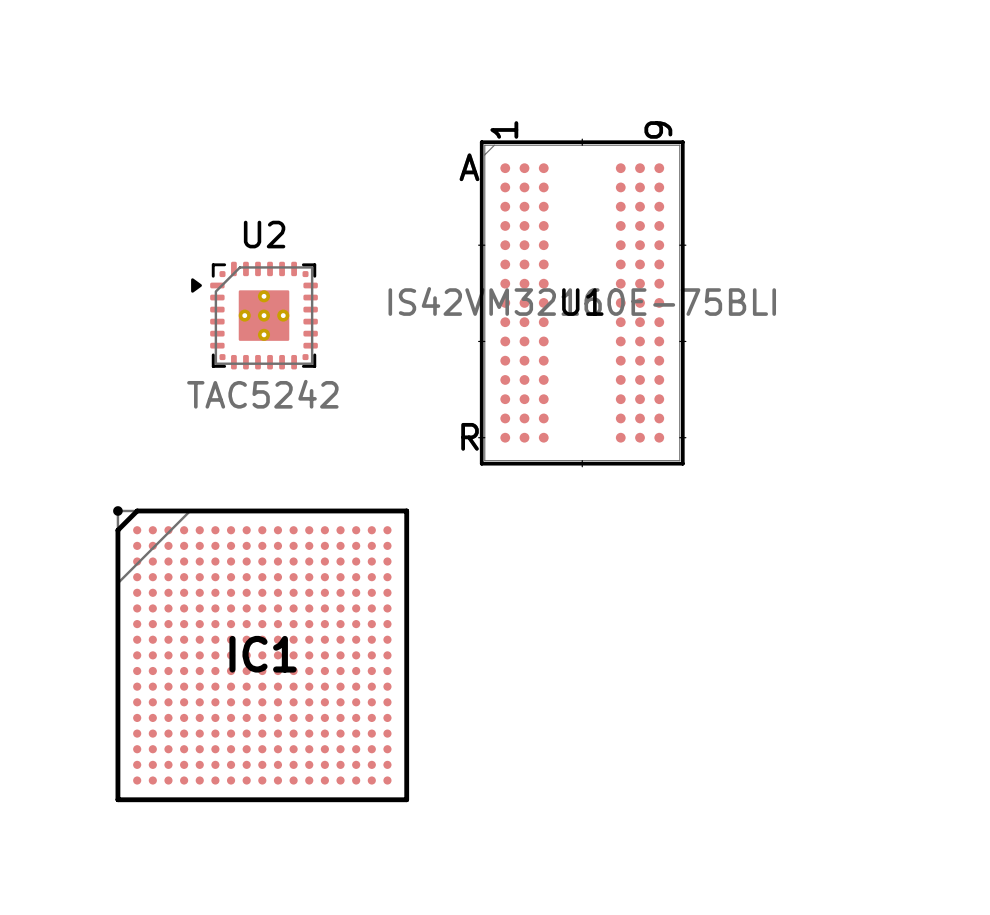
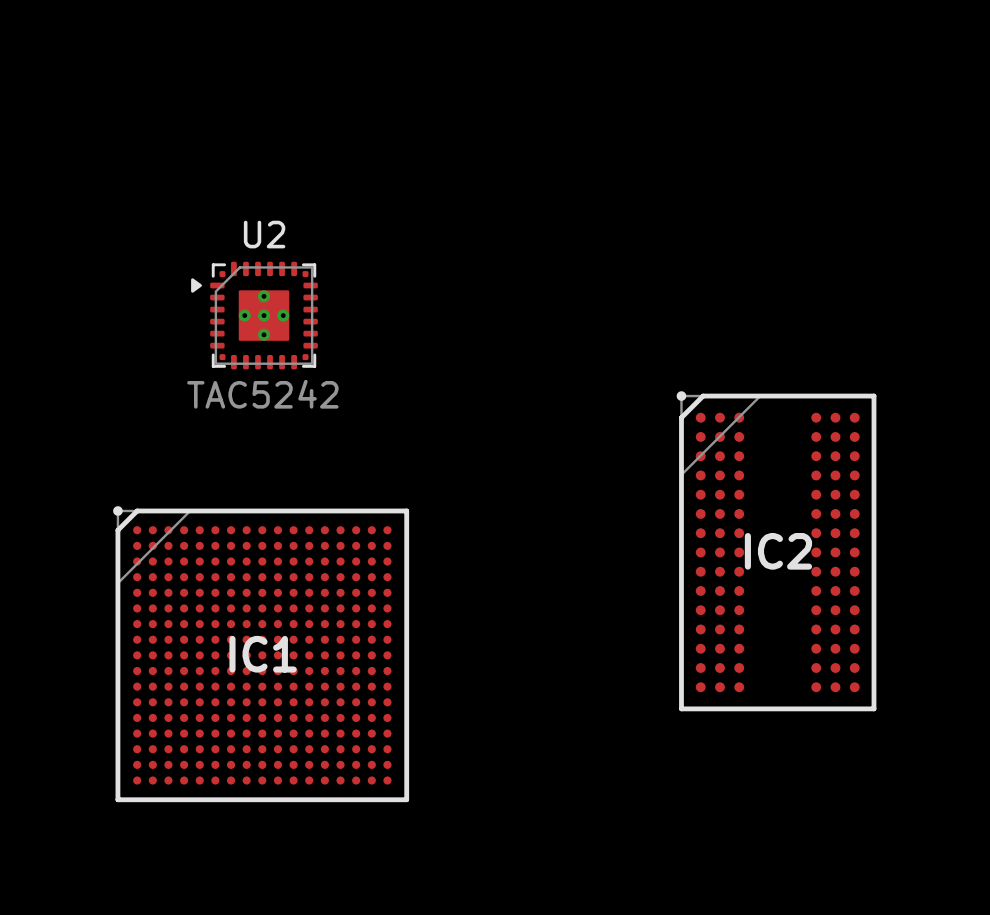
U1: IS42VM32160E-75BLI (582, 302) -> none
IC2: none -> (776, 551)

